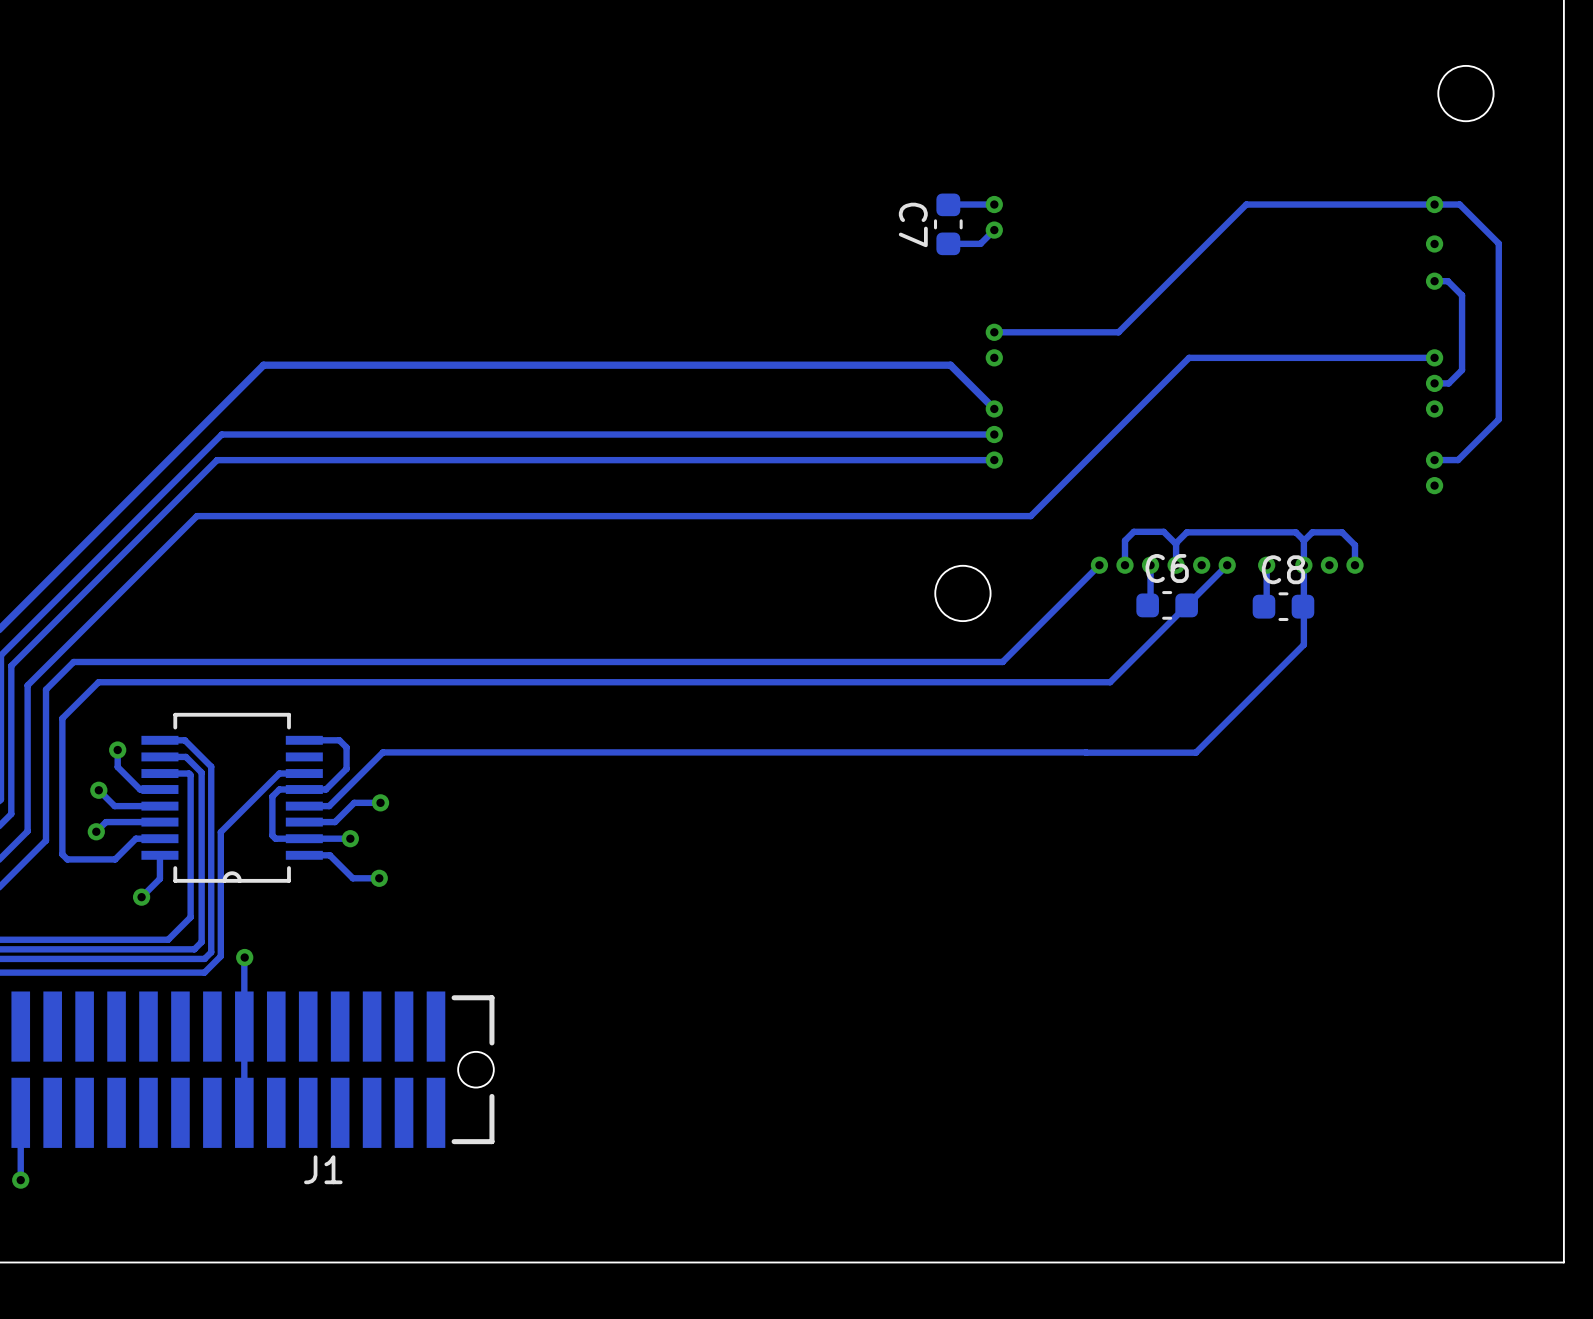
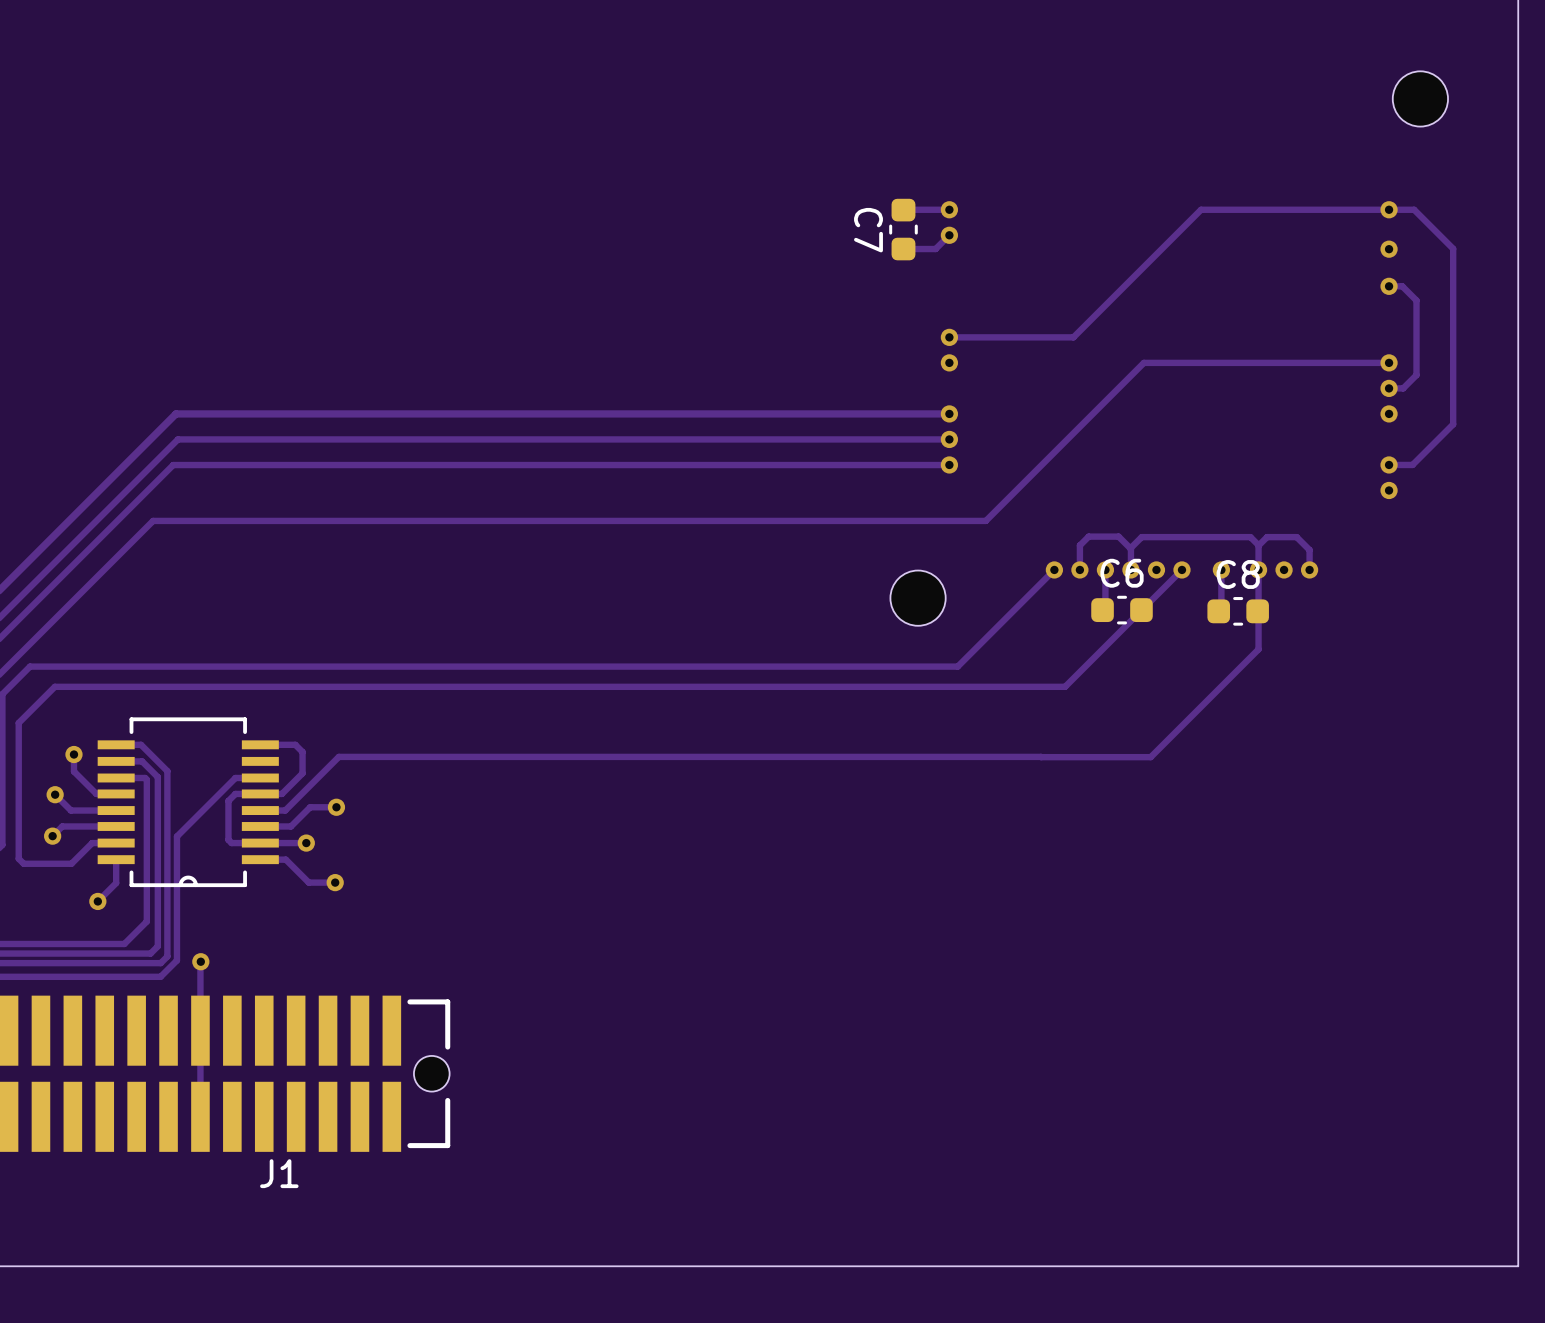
track: (994, 408) (950, 365) (263, 365) (219, 408) -> (949, 413) (175, 413)

